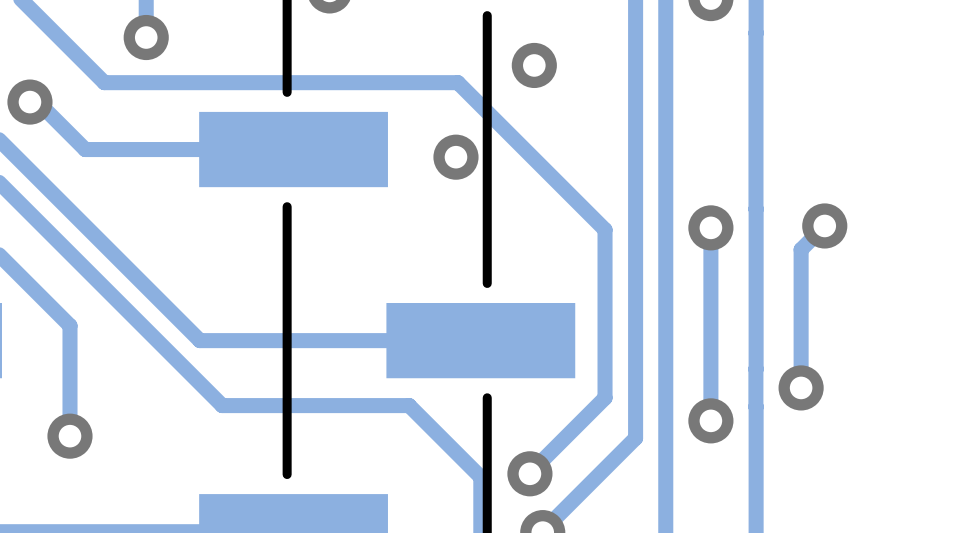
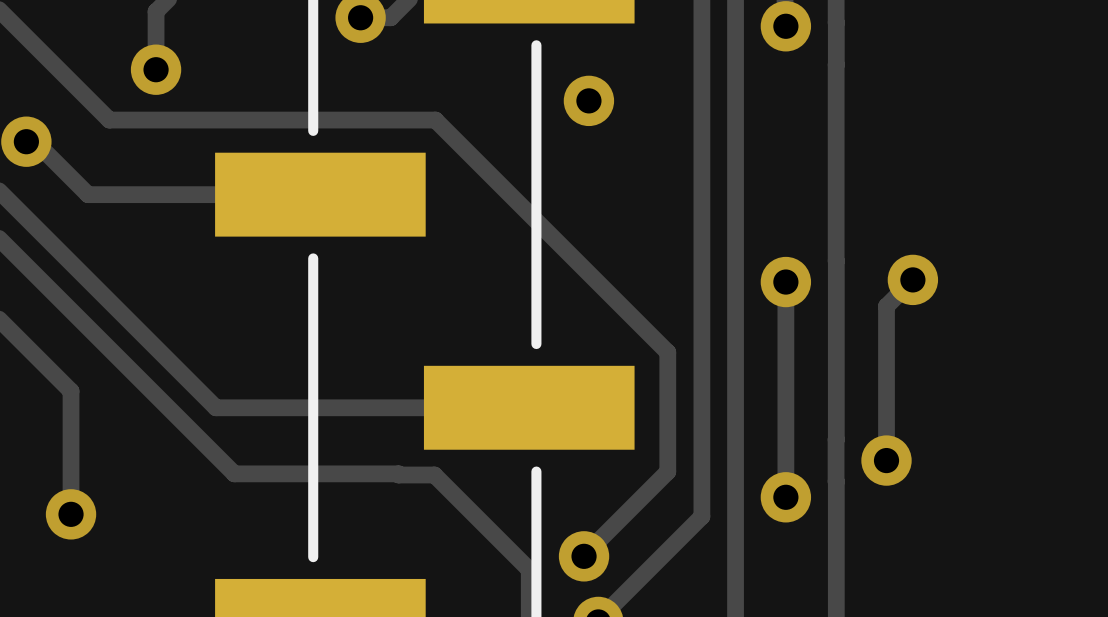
track: (396, 82) (457, 82) (605, 229) (605, 290) -> (435, 120) (667, 352)
via: (455, 157) -> none
track: (216, 399) (222, 405) (409, 405) (480, 477) (480, 485) -> (234, 473) (398, 473)
track: none -> (398, 474) (434, 474) (529, 569)

